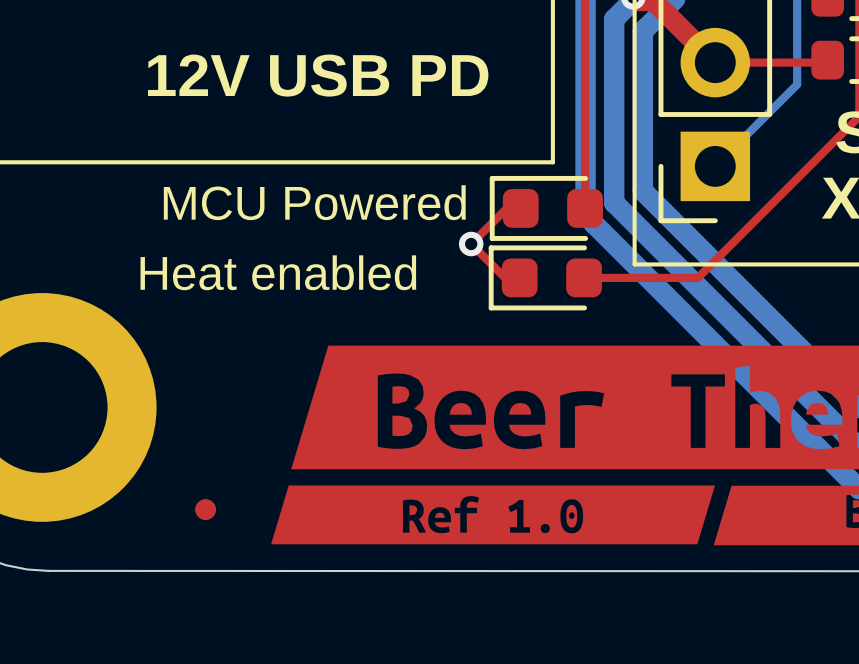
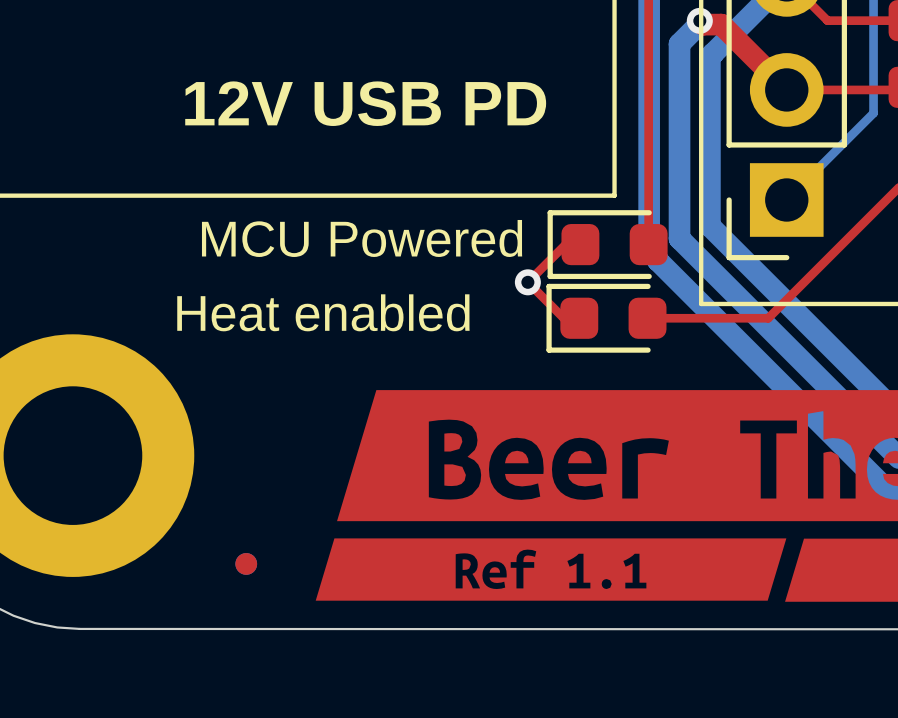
drawing shape: [271, 485, 715, 545] -> [315, 538, 787, 601]

